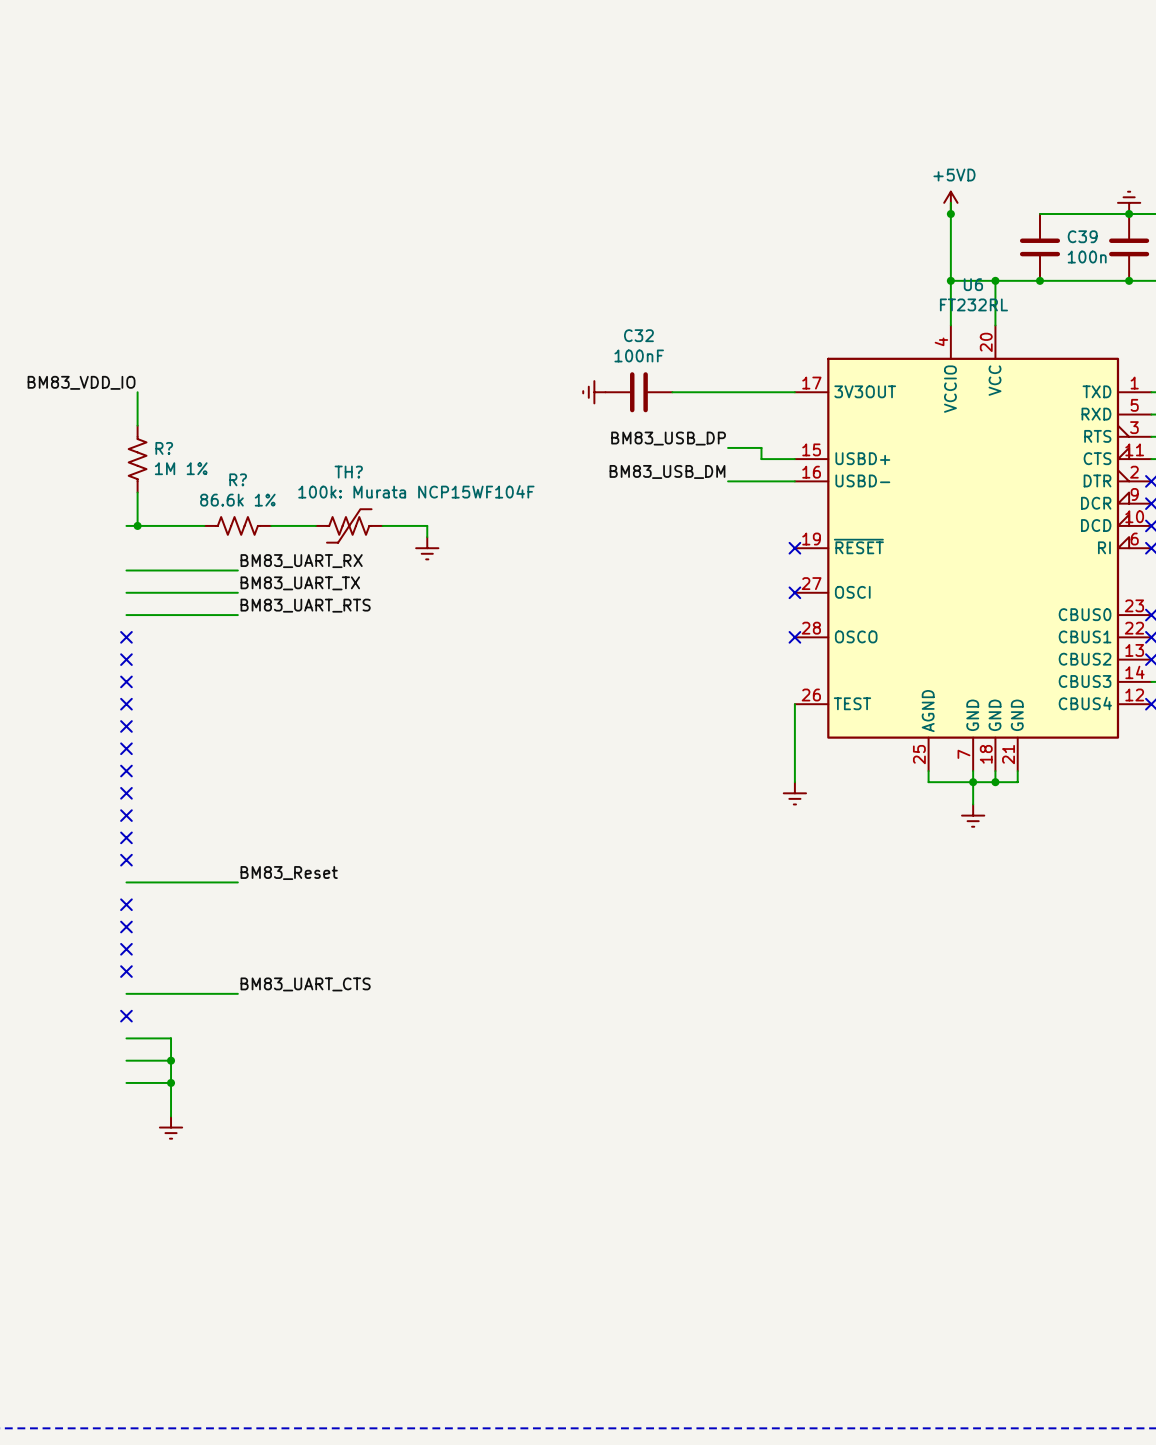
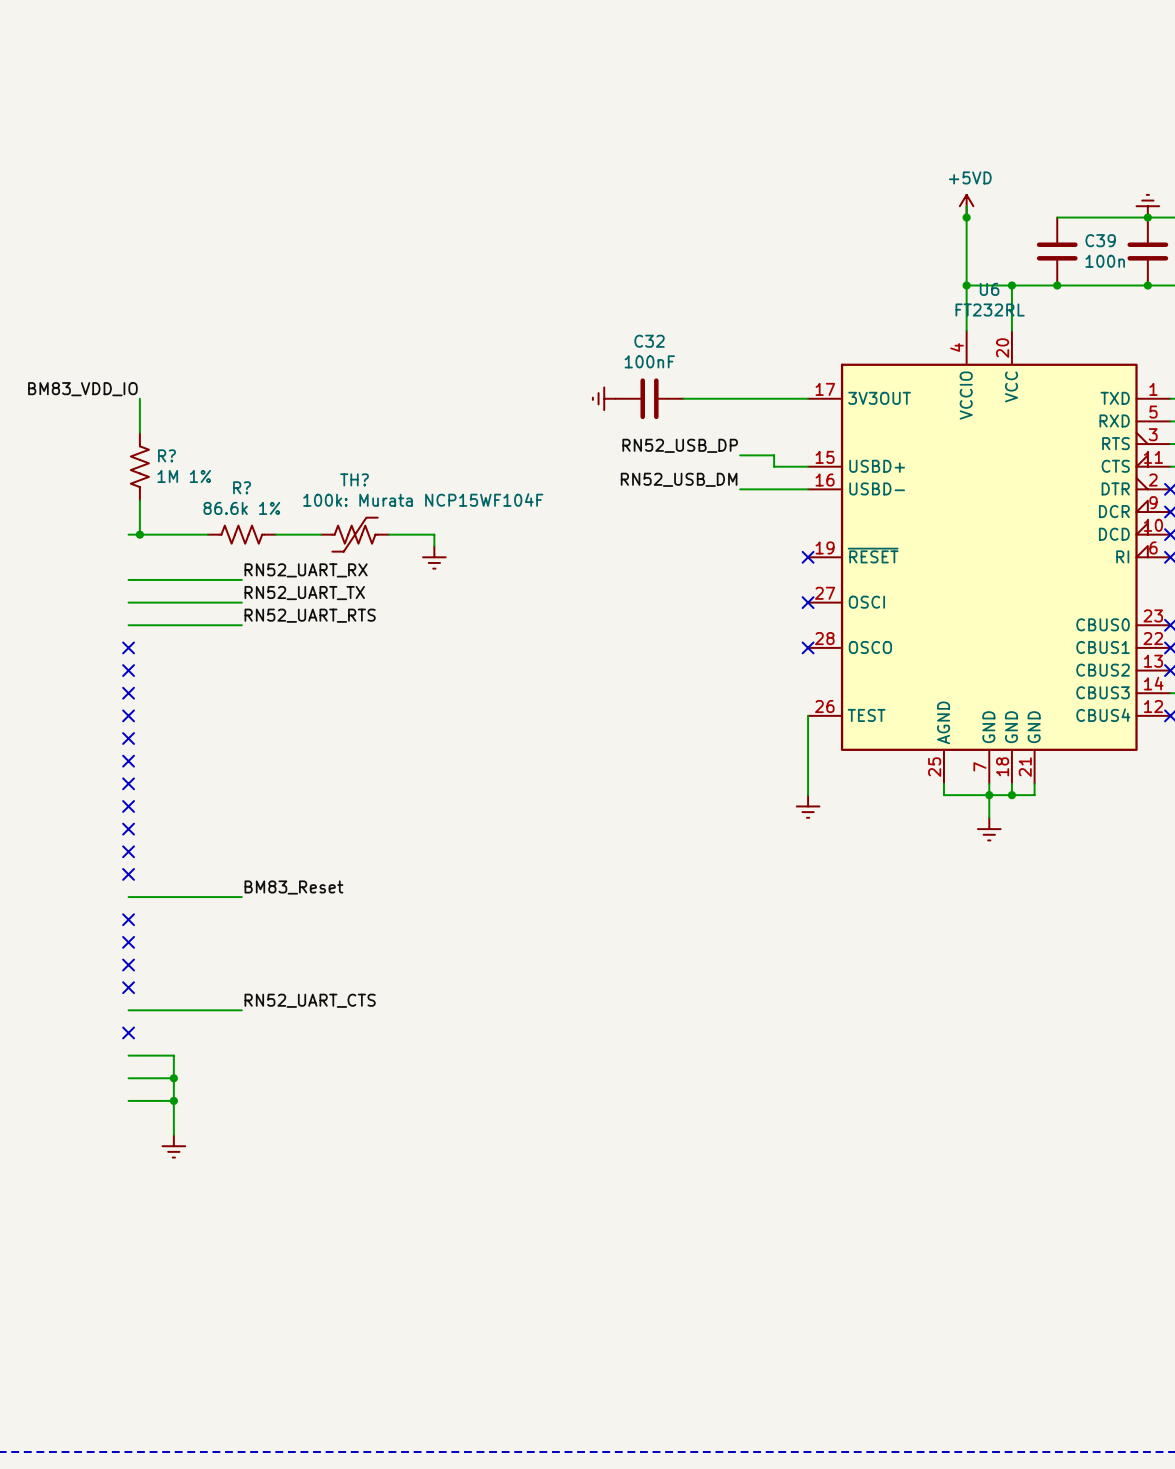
label: BM83_USB_DP (668, 438) -> RN52_USB_DP (680, 445)
label: BM83_USB_DM (667, 471) -> RN52_USB_DM (679, 479)
label: BM83_UART_RX (301, 561) -> RN52_UART_RX (306, 570)
label: BM83_UART_TX (300, 583) -> RN52_UART_TX (304, 593)
label: BM83_UART_RTS (305, 605) -> RN52_UART_RTS (310, 615)
label: BM83_UART_CTS (305, 984) -> RN52_UART_CTS (310, 1000)

